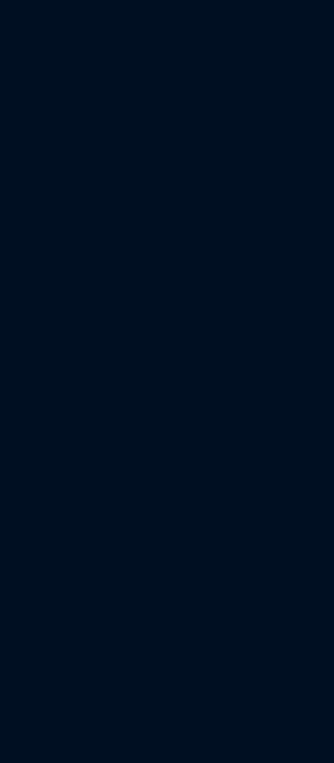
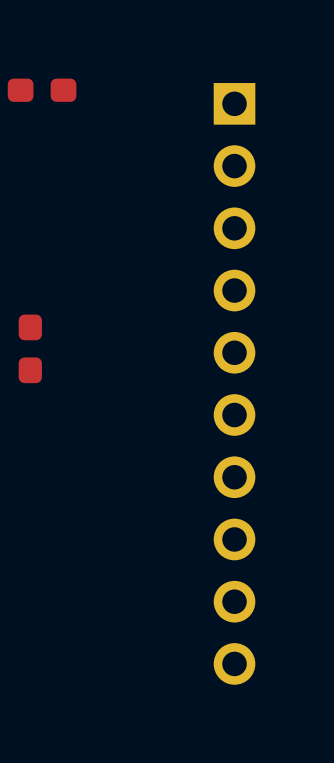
part: none -> (42, 90)
part: none -> (30, 348)
part: none -> (234, 383)

